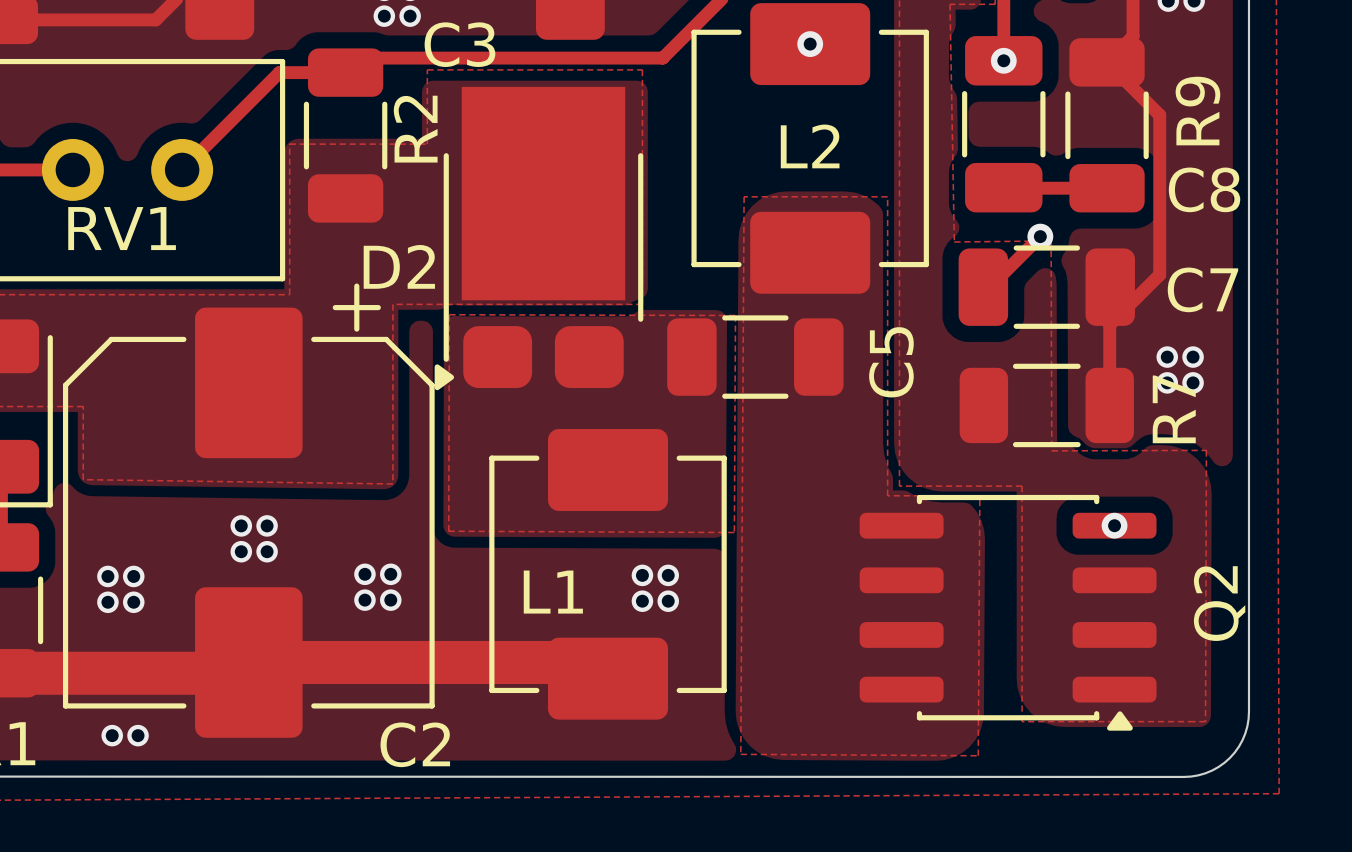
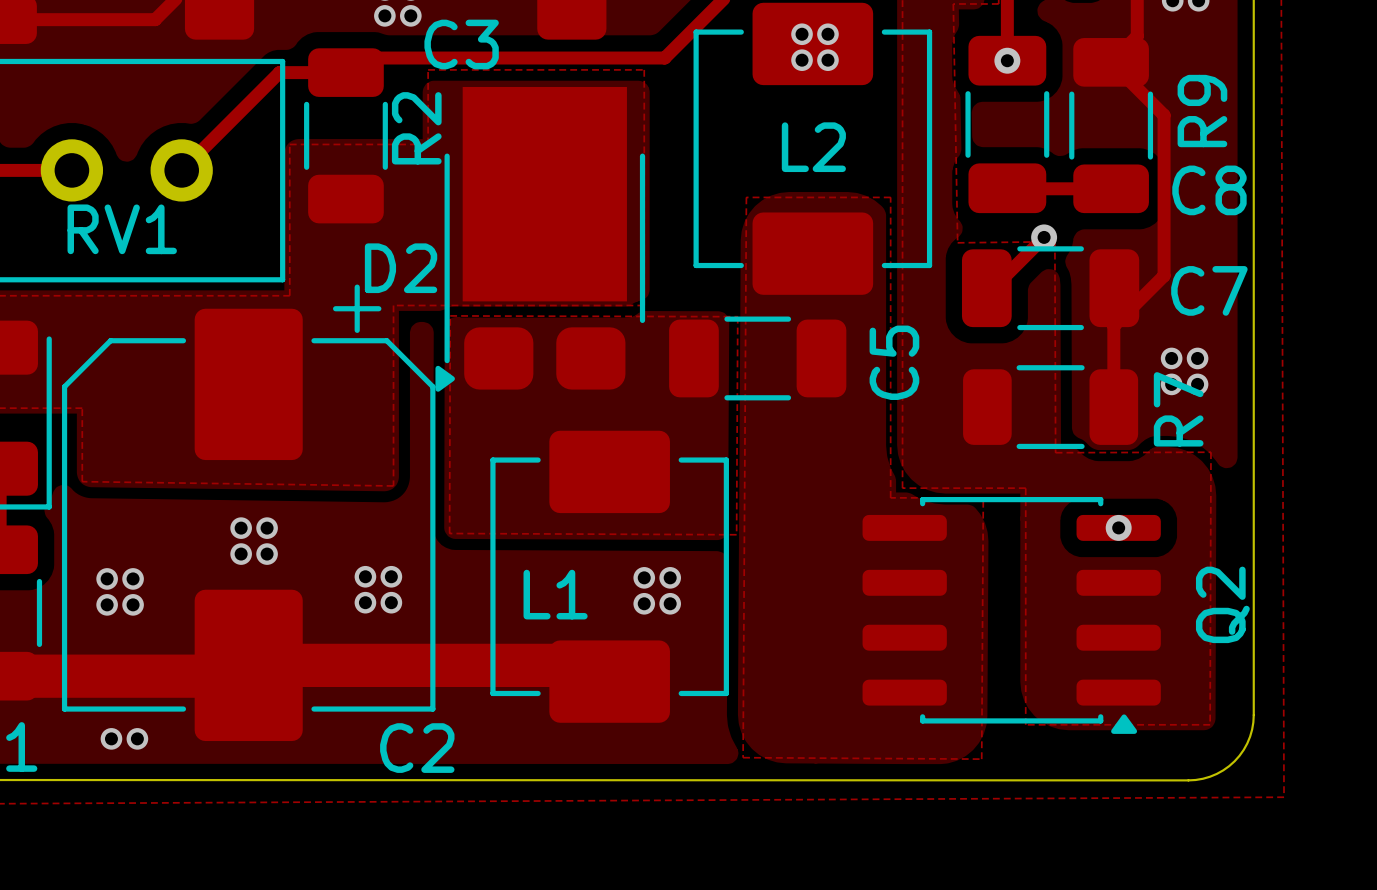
via: none -> (802, 34)
via: none -> (827, 34)
via: (810, 44) -> none
via: none -> (802, 60)
via: none -> (827, 60)

